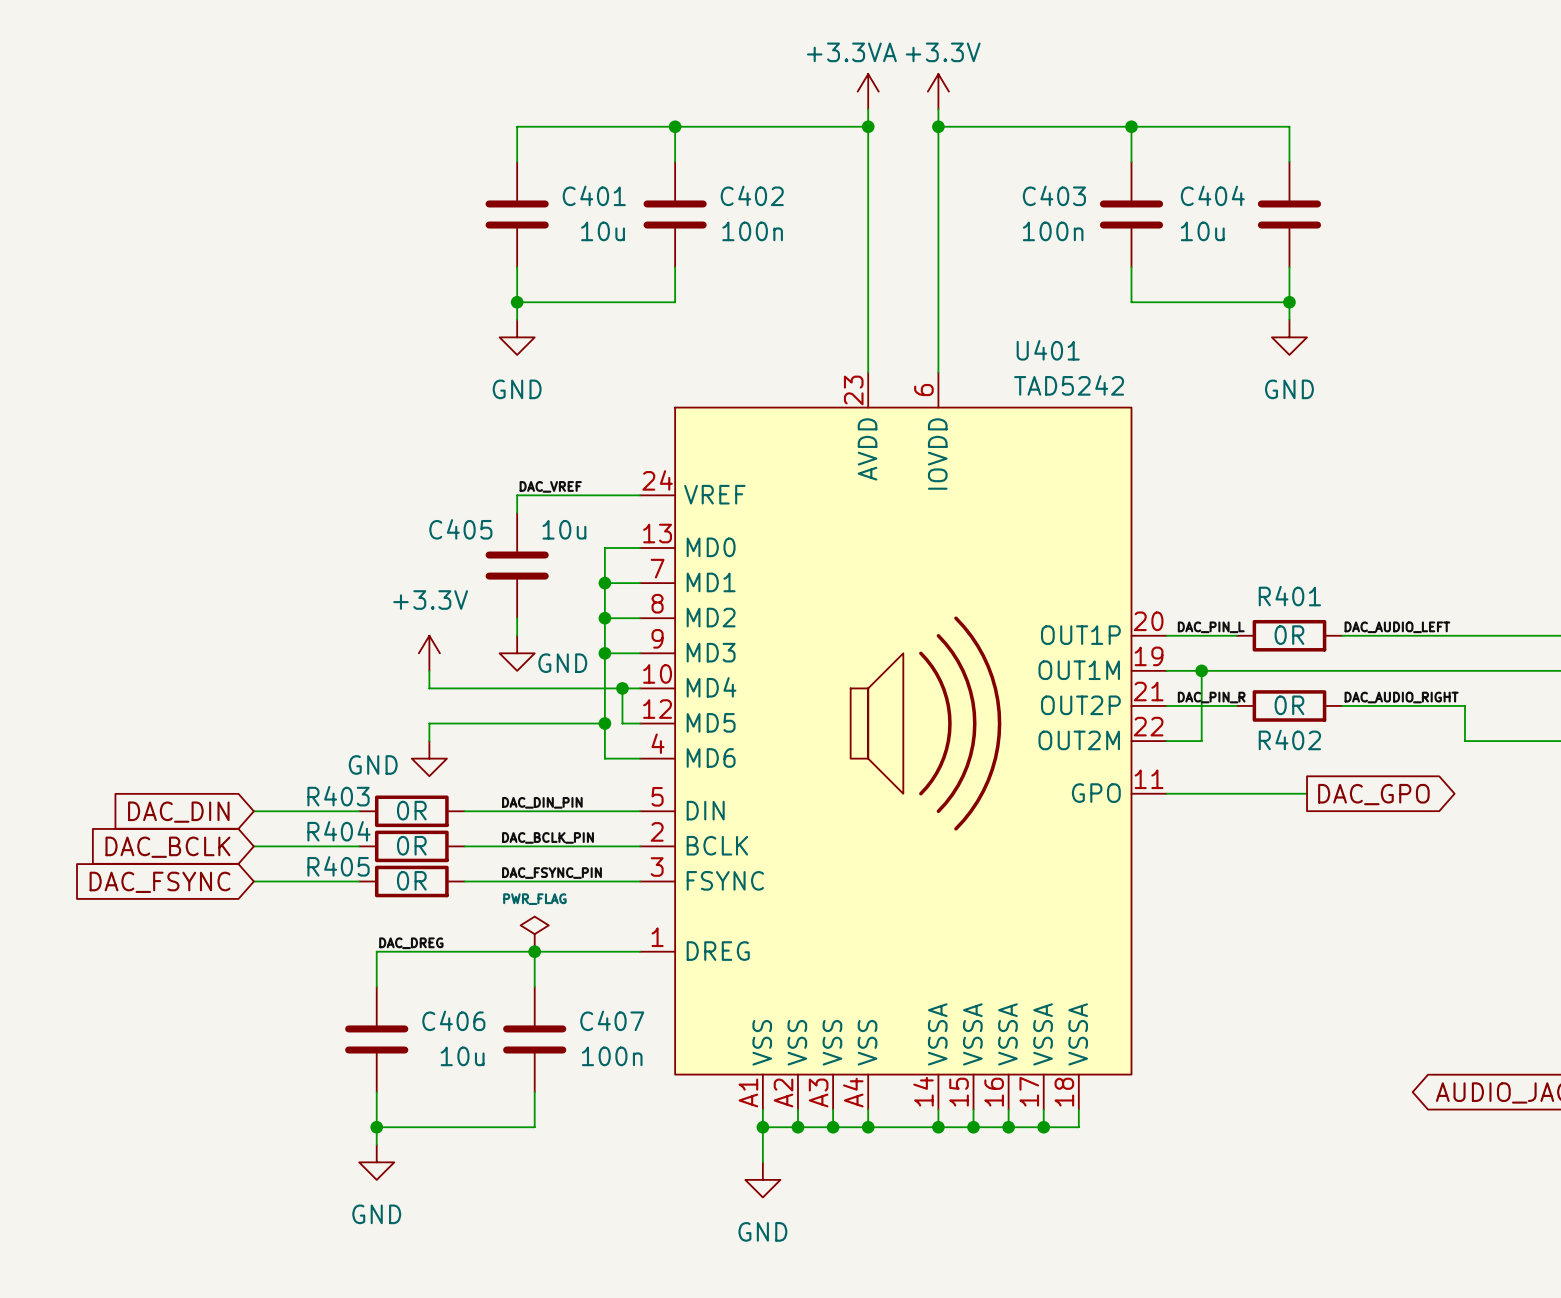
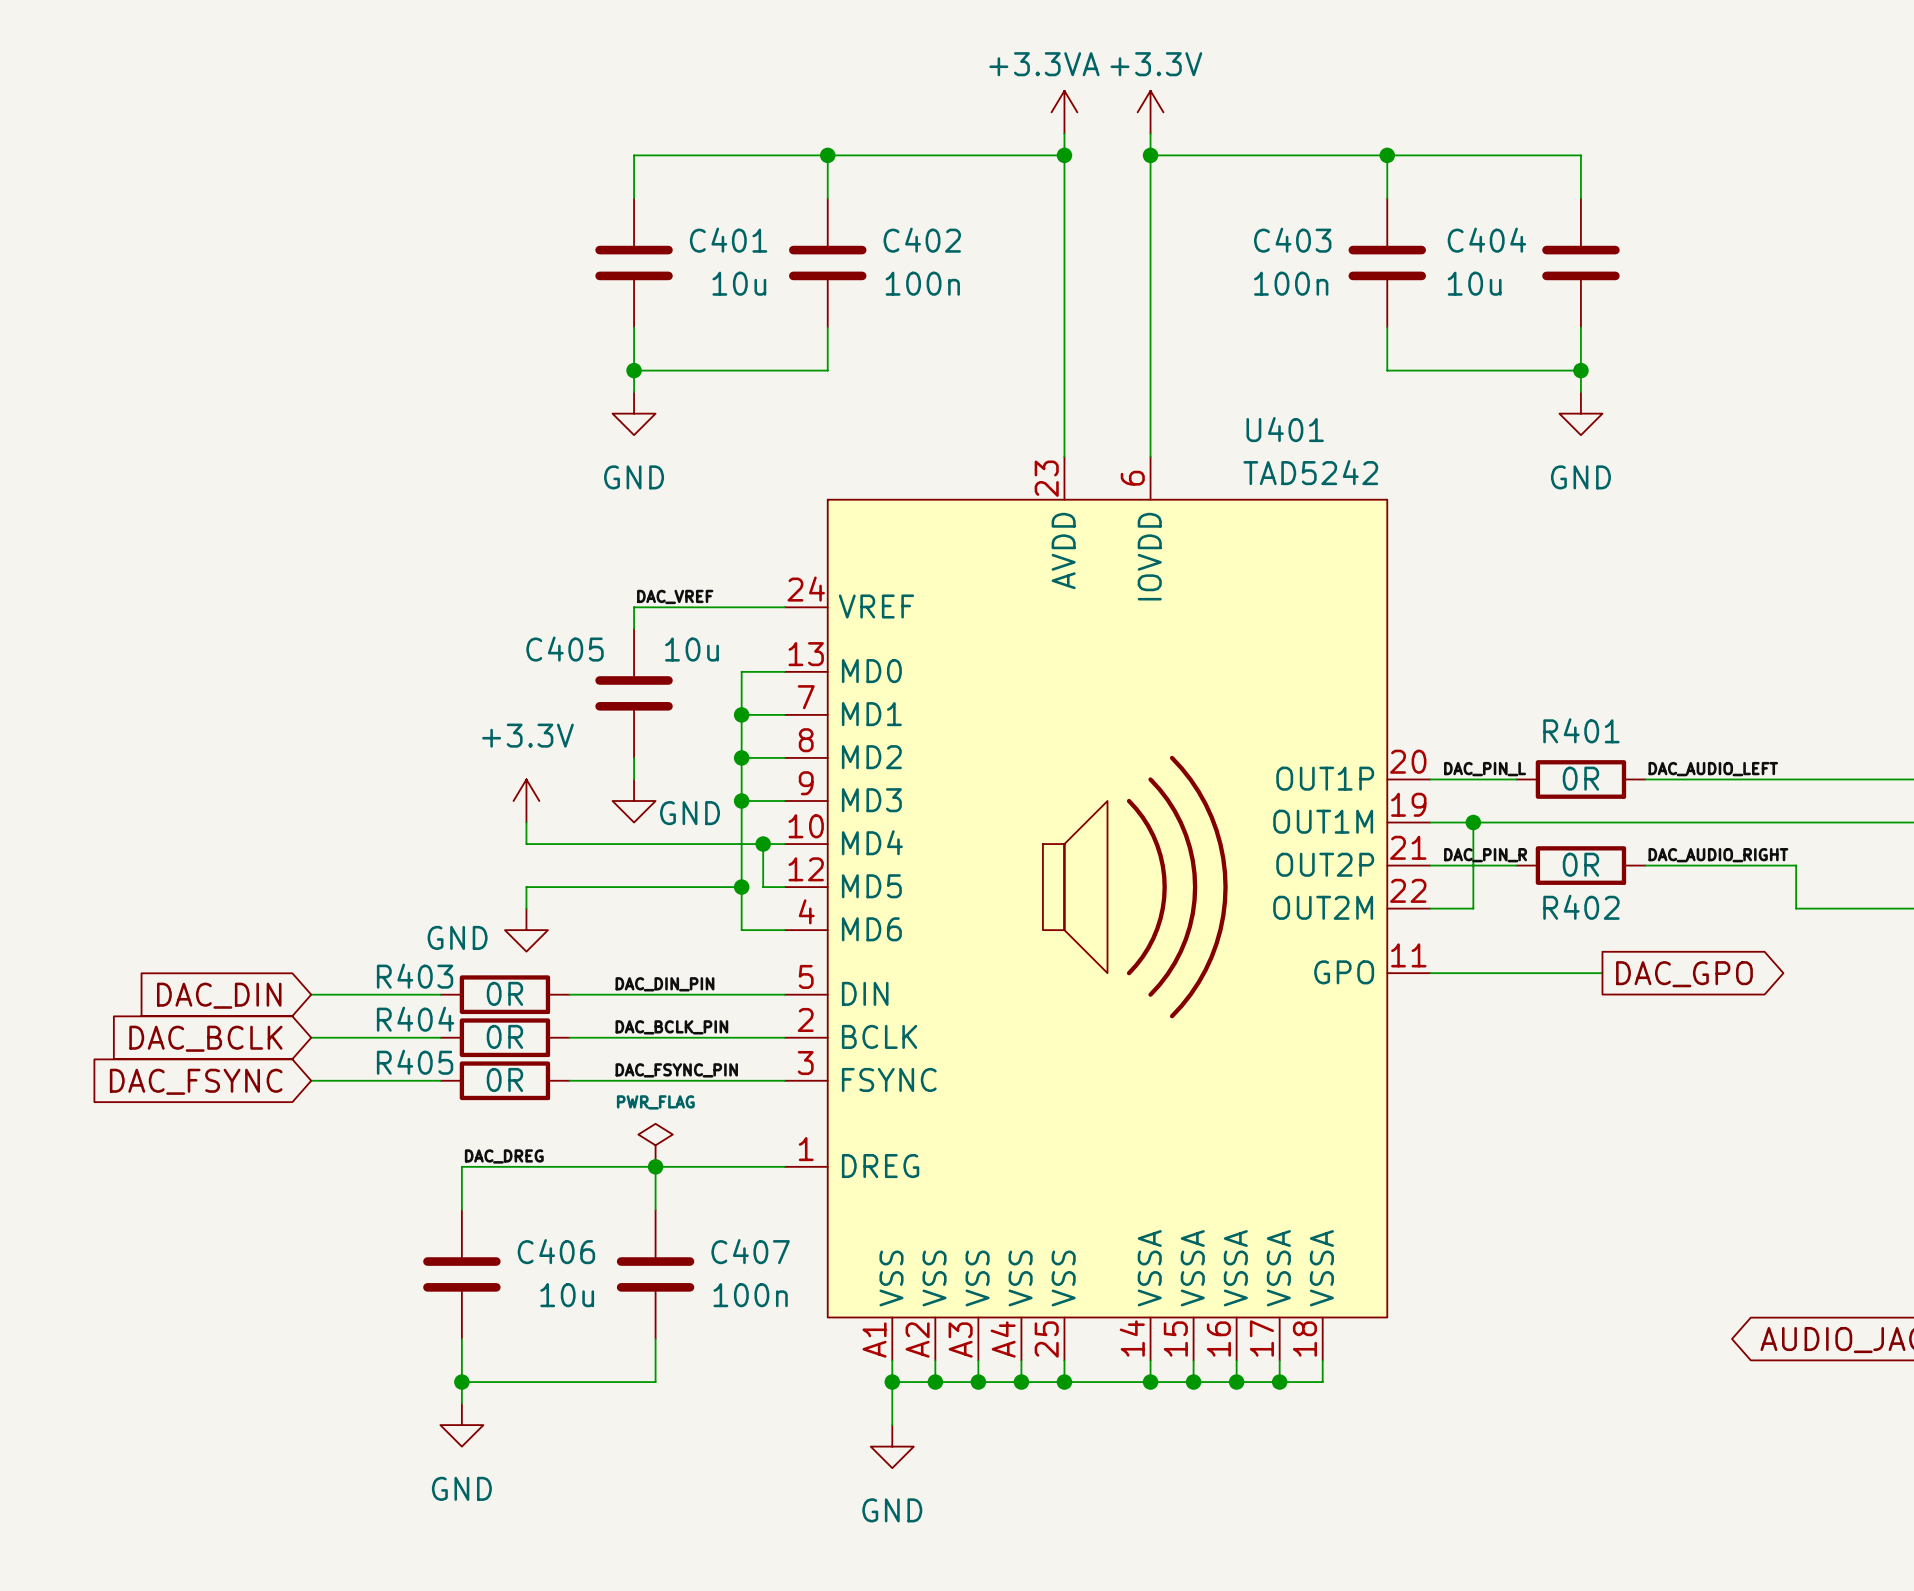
U401 symbol: [640, 372, 1167, 1110] -> [784, 456, 1431, 1361]
wire: none -> (892, 1360) (892, 1425)
junction: none -> (892, 1382)
wire: (762, 1127) (762, 1162) -> (935, 1382) (892, 1382)
power symbol position: GND (762, 1179) -> GND (892, 1446)

